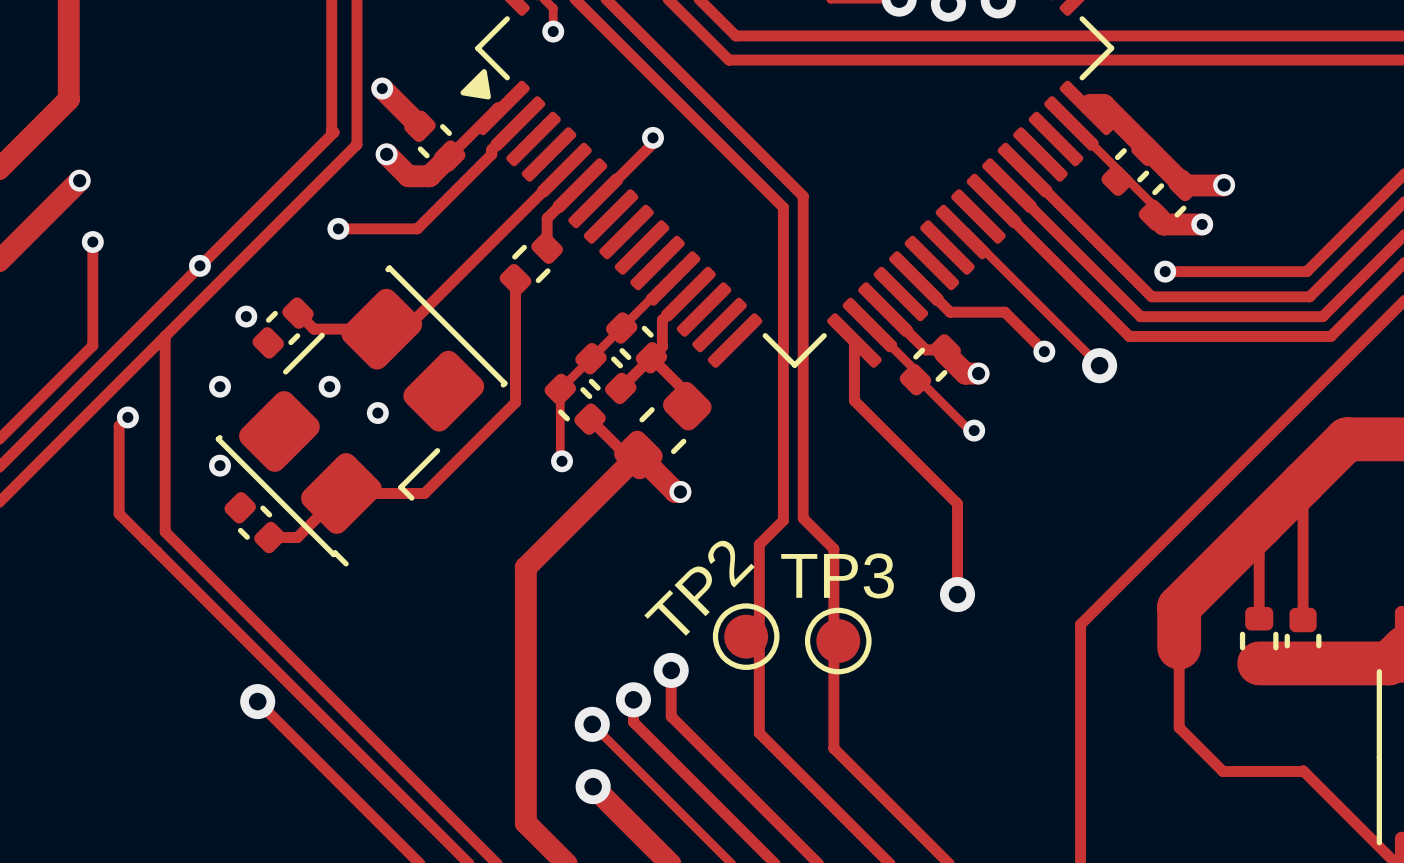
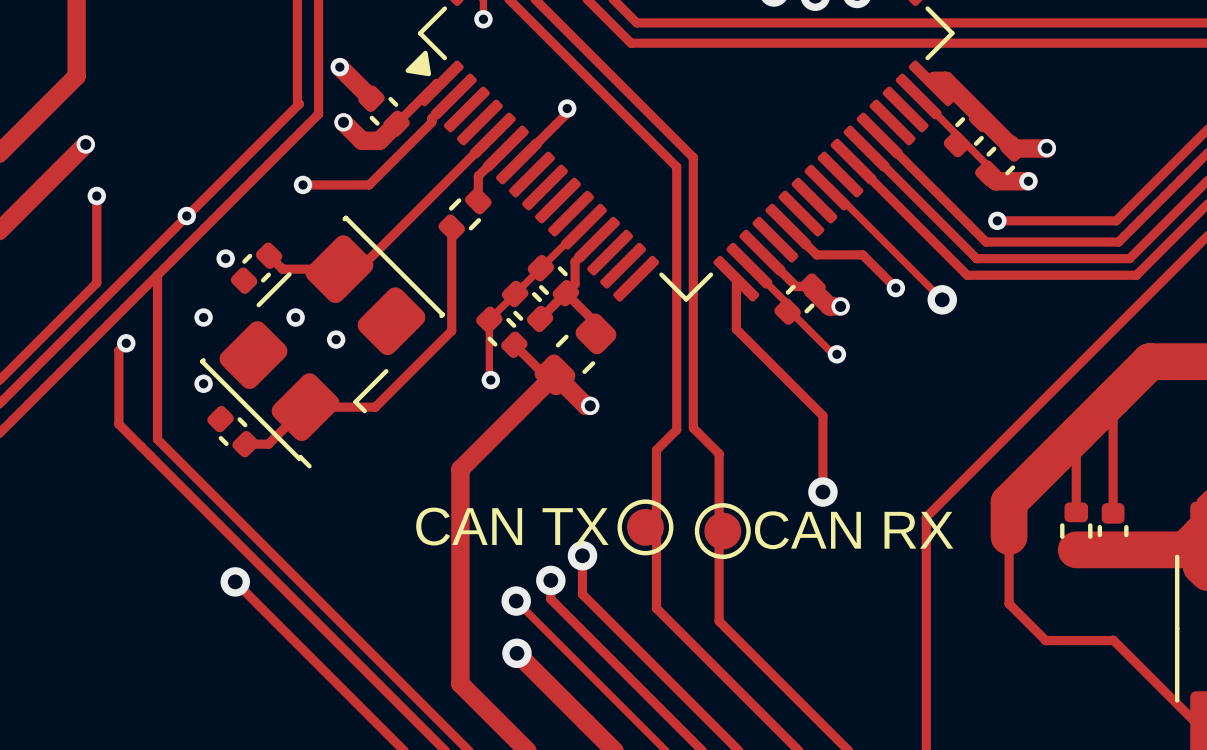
TP3 name: TP3 (837, 575) -> none
TP2 name: TP2 (699, 588) -> none
text: none -> CAN TX (512, 526)
text: none -> CAN RX (854, 530)

